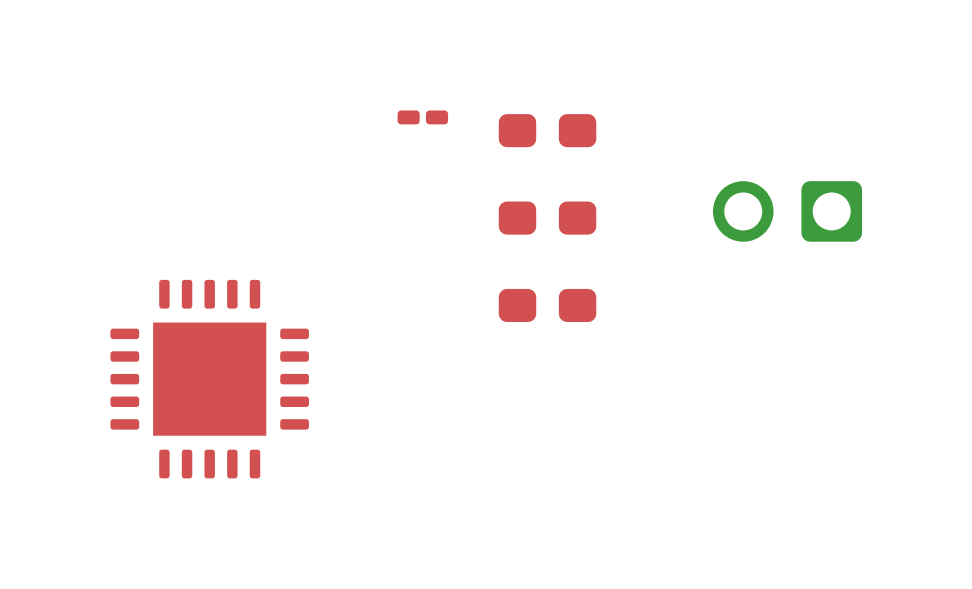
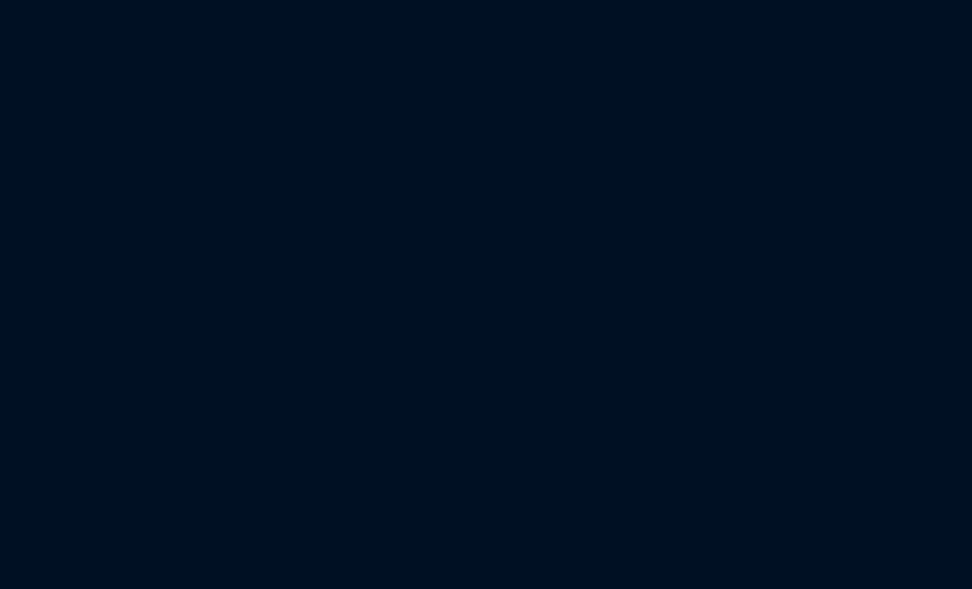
part: (422, 117) -> none
part: (547, 130) -> none
part: (787, 211) -> none
part: (547, 218) -> none
part: (547, 305) -> none
part: (209, 379) -> none

